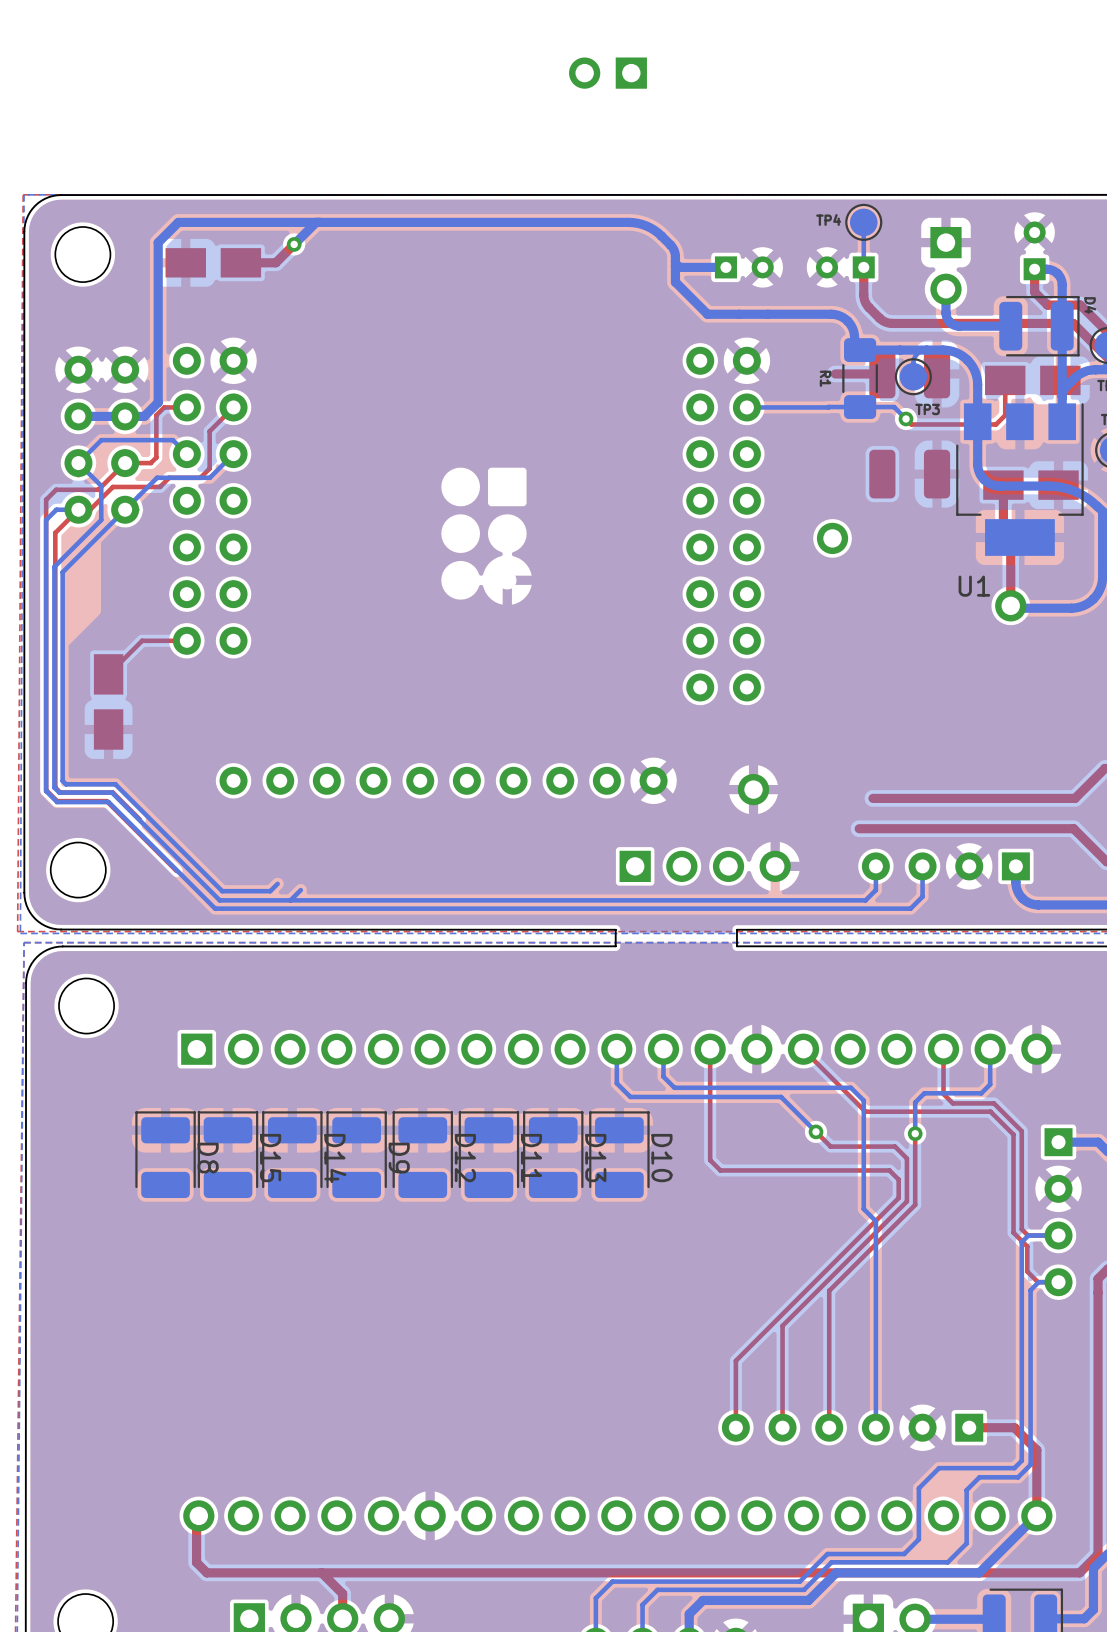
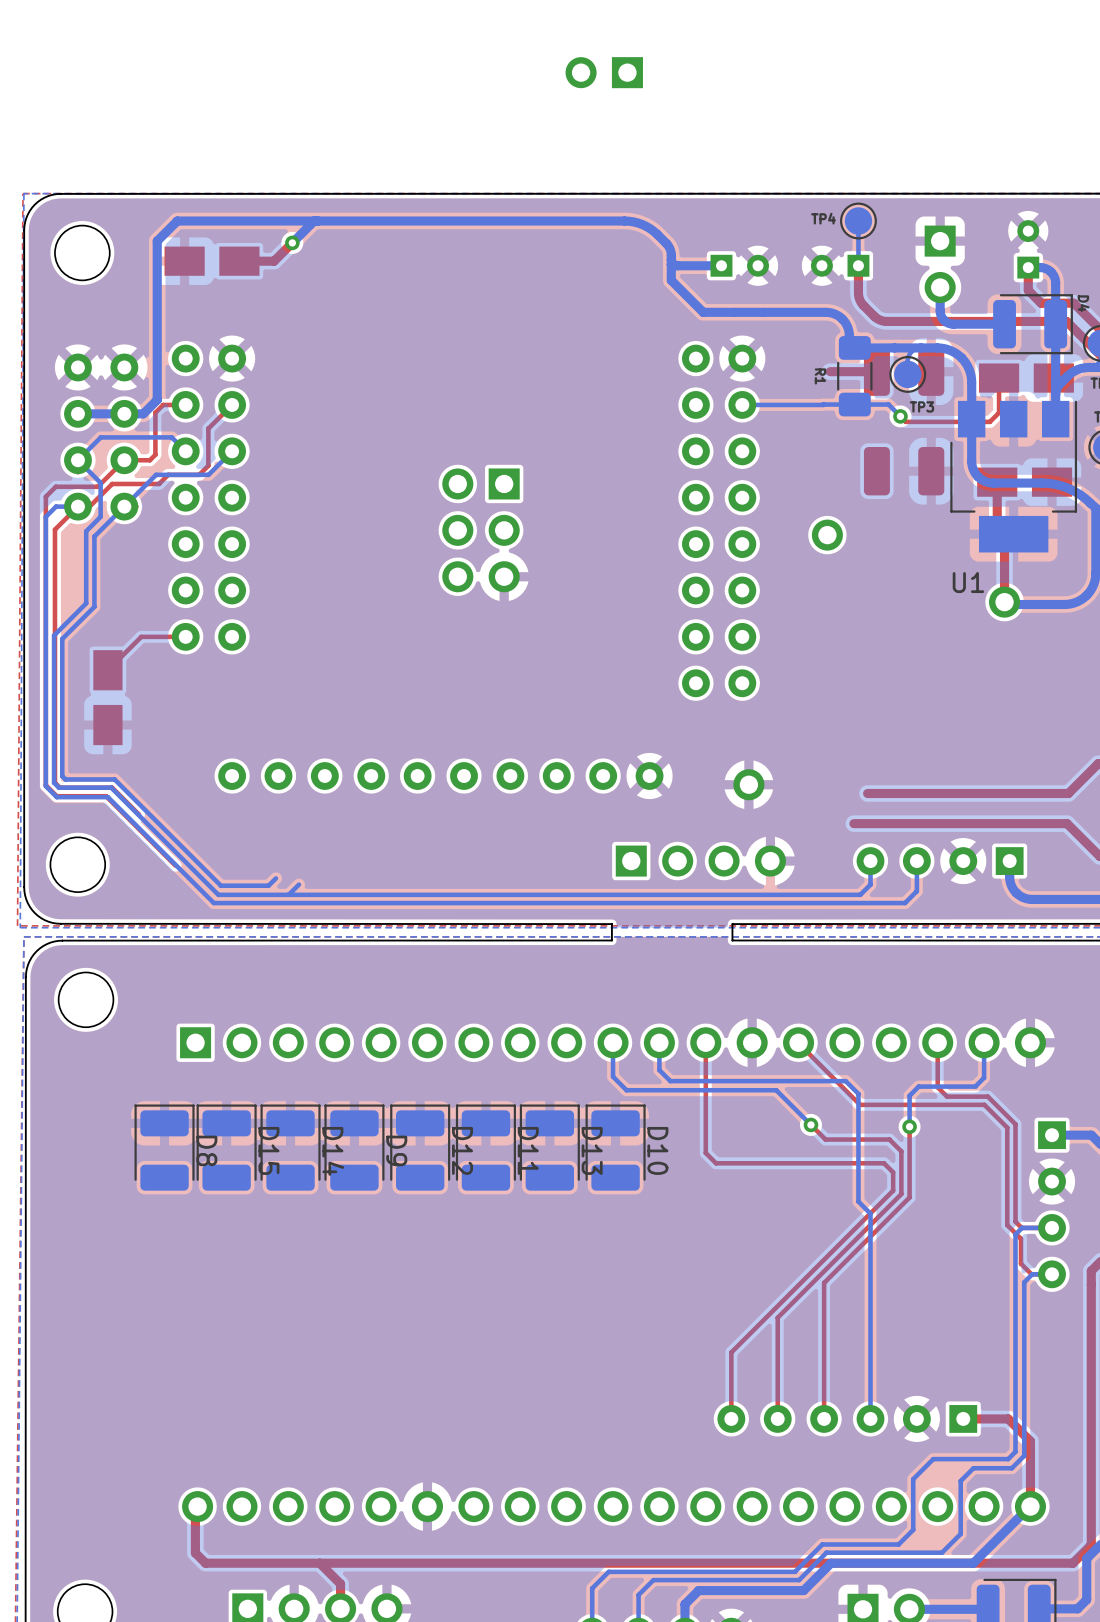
part: none -> (481, 530)
bottom track: (86, 534) (54, 566) (54, 639) -> (86, 531) (86, 603) (54, 635)
bottom track: (95, 539) (62, 572) (62, 642) -> (94, 536) (94, 606) (62, 638)

